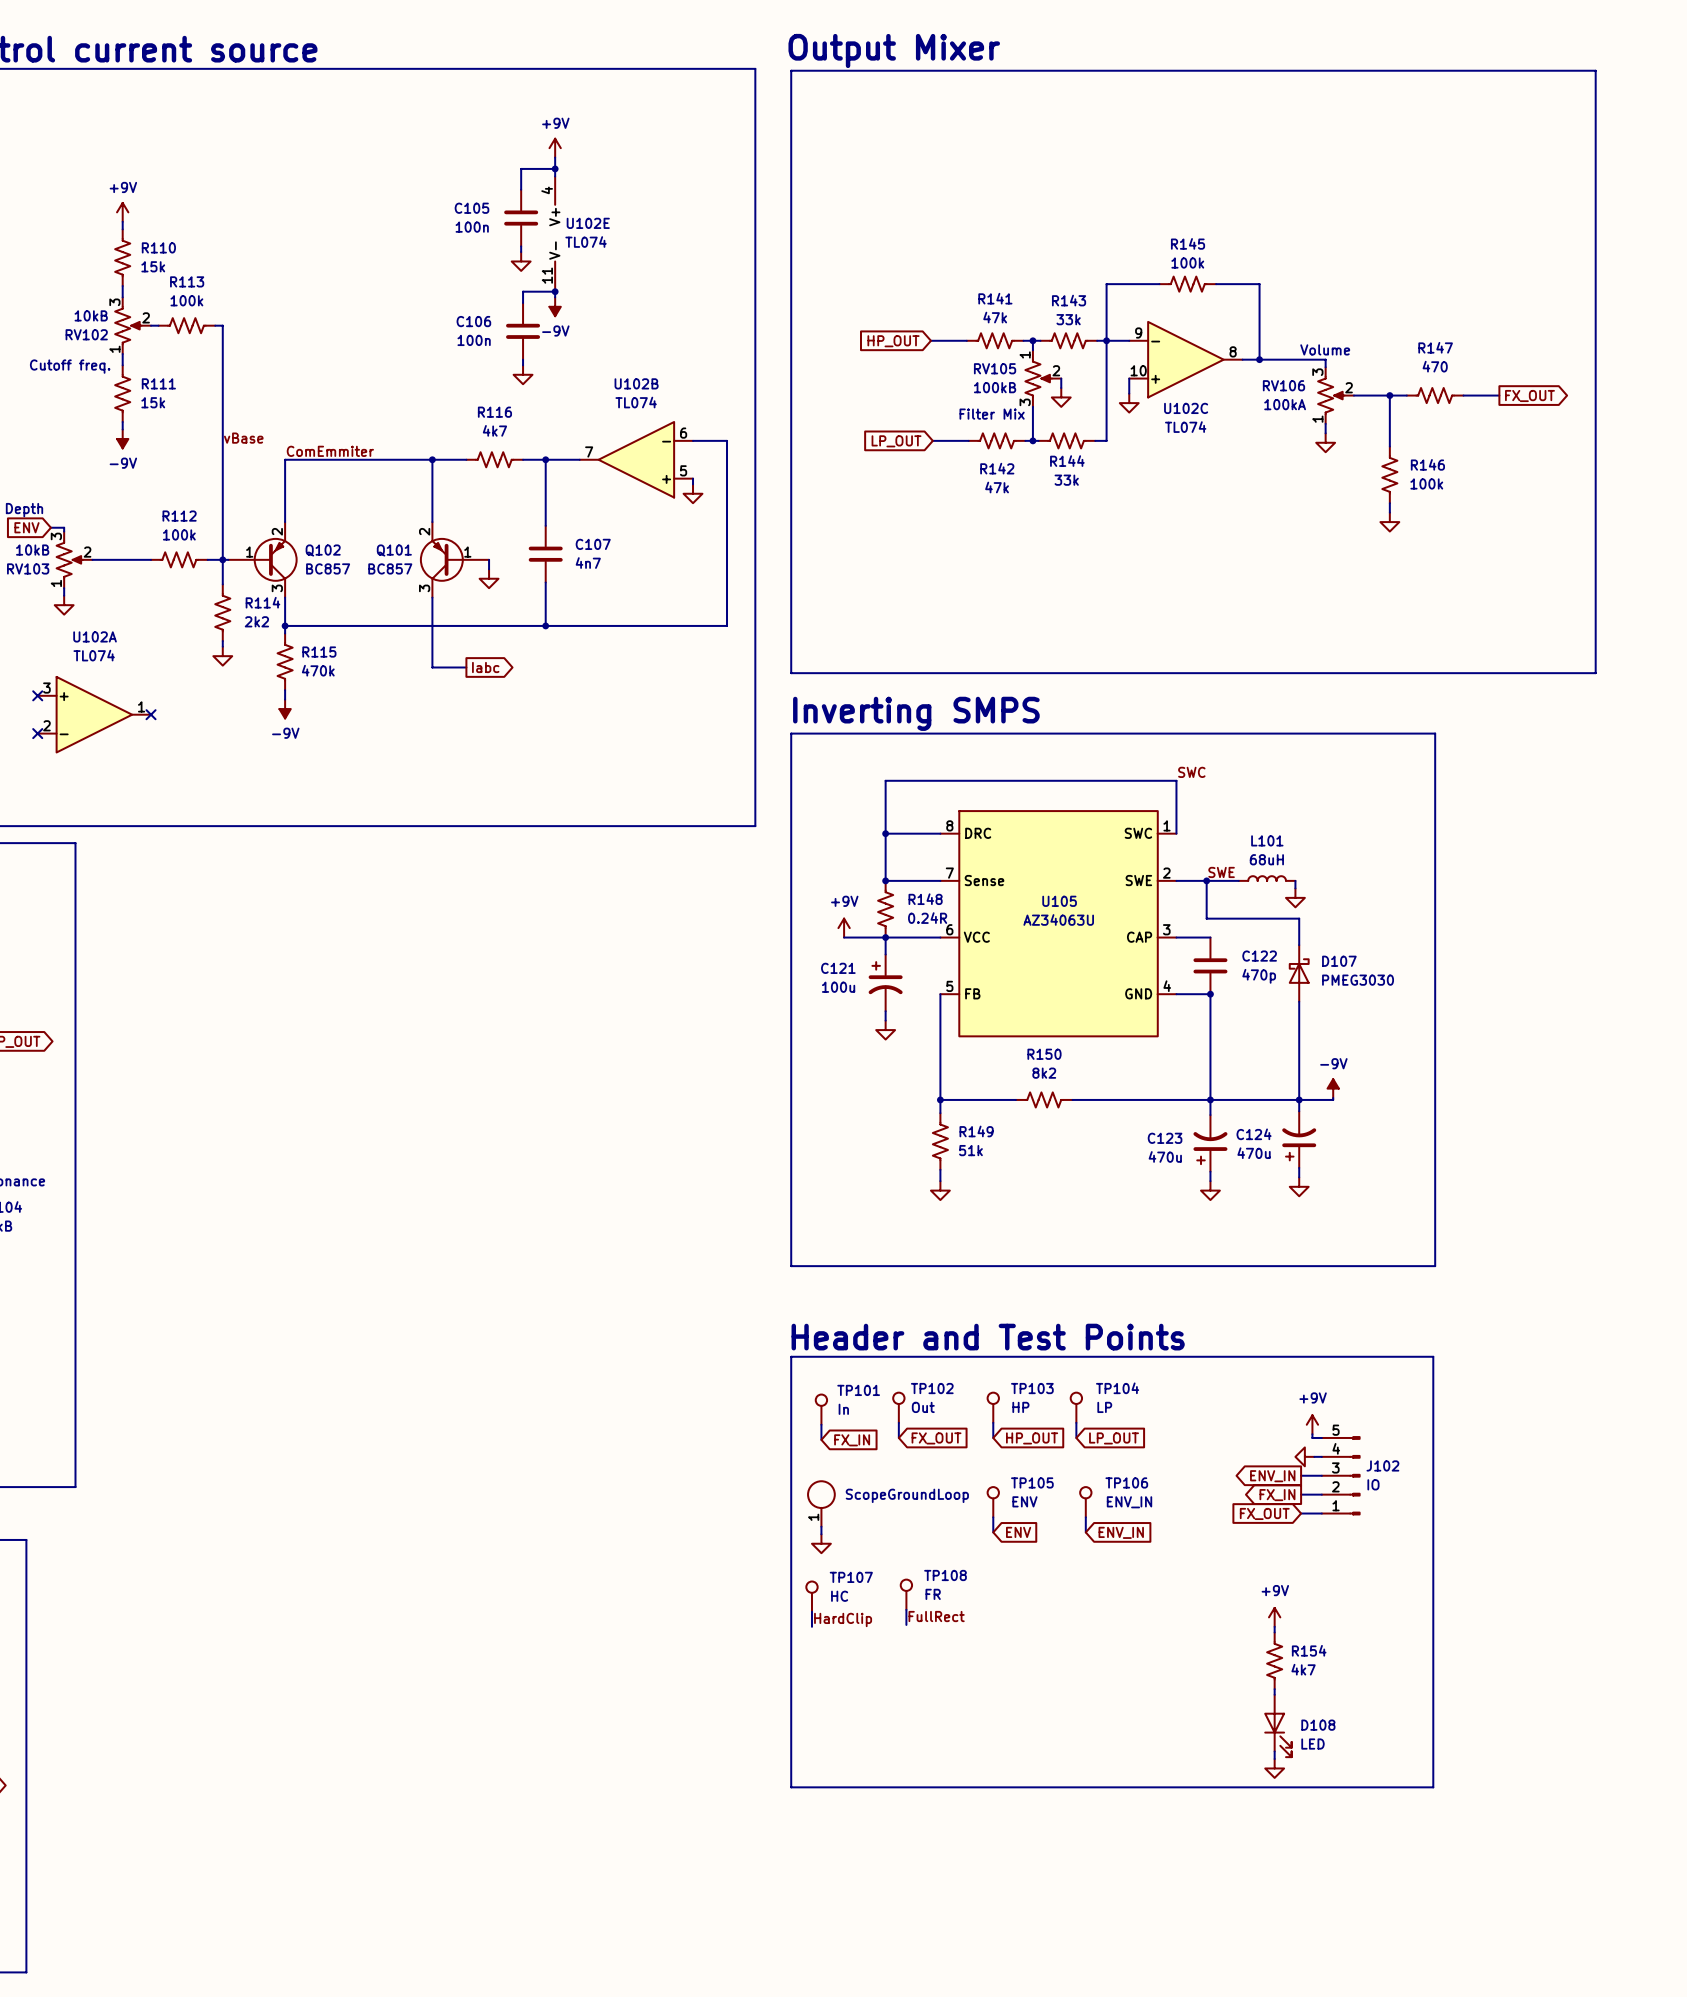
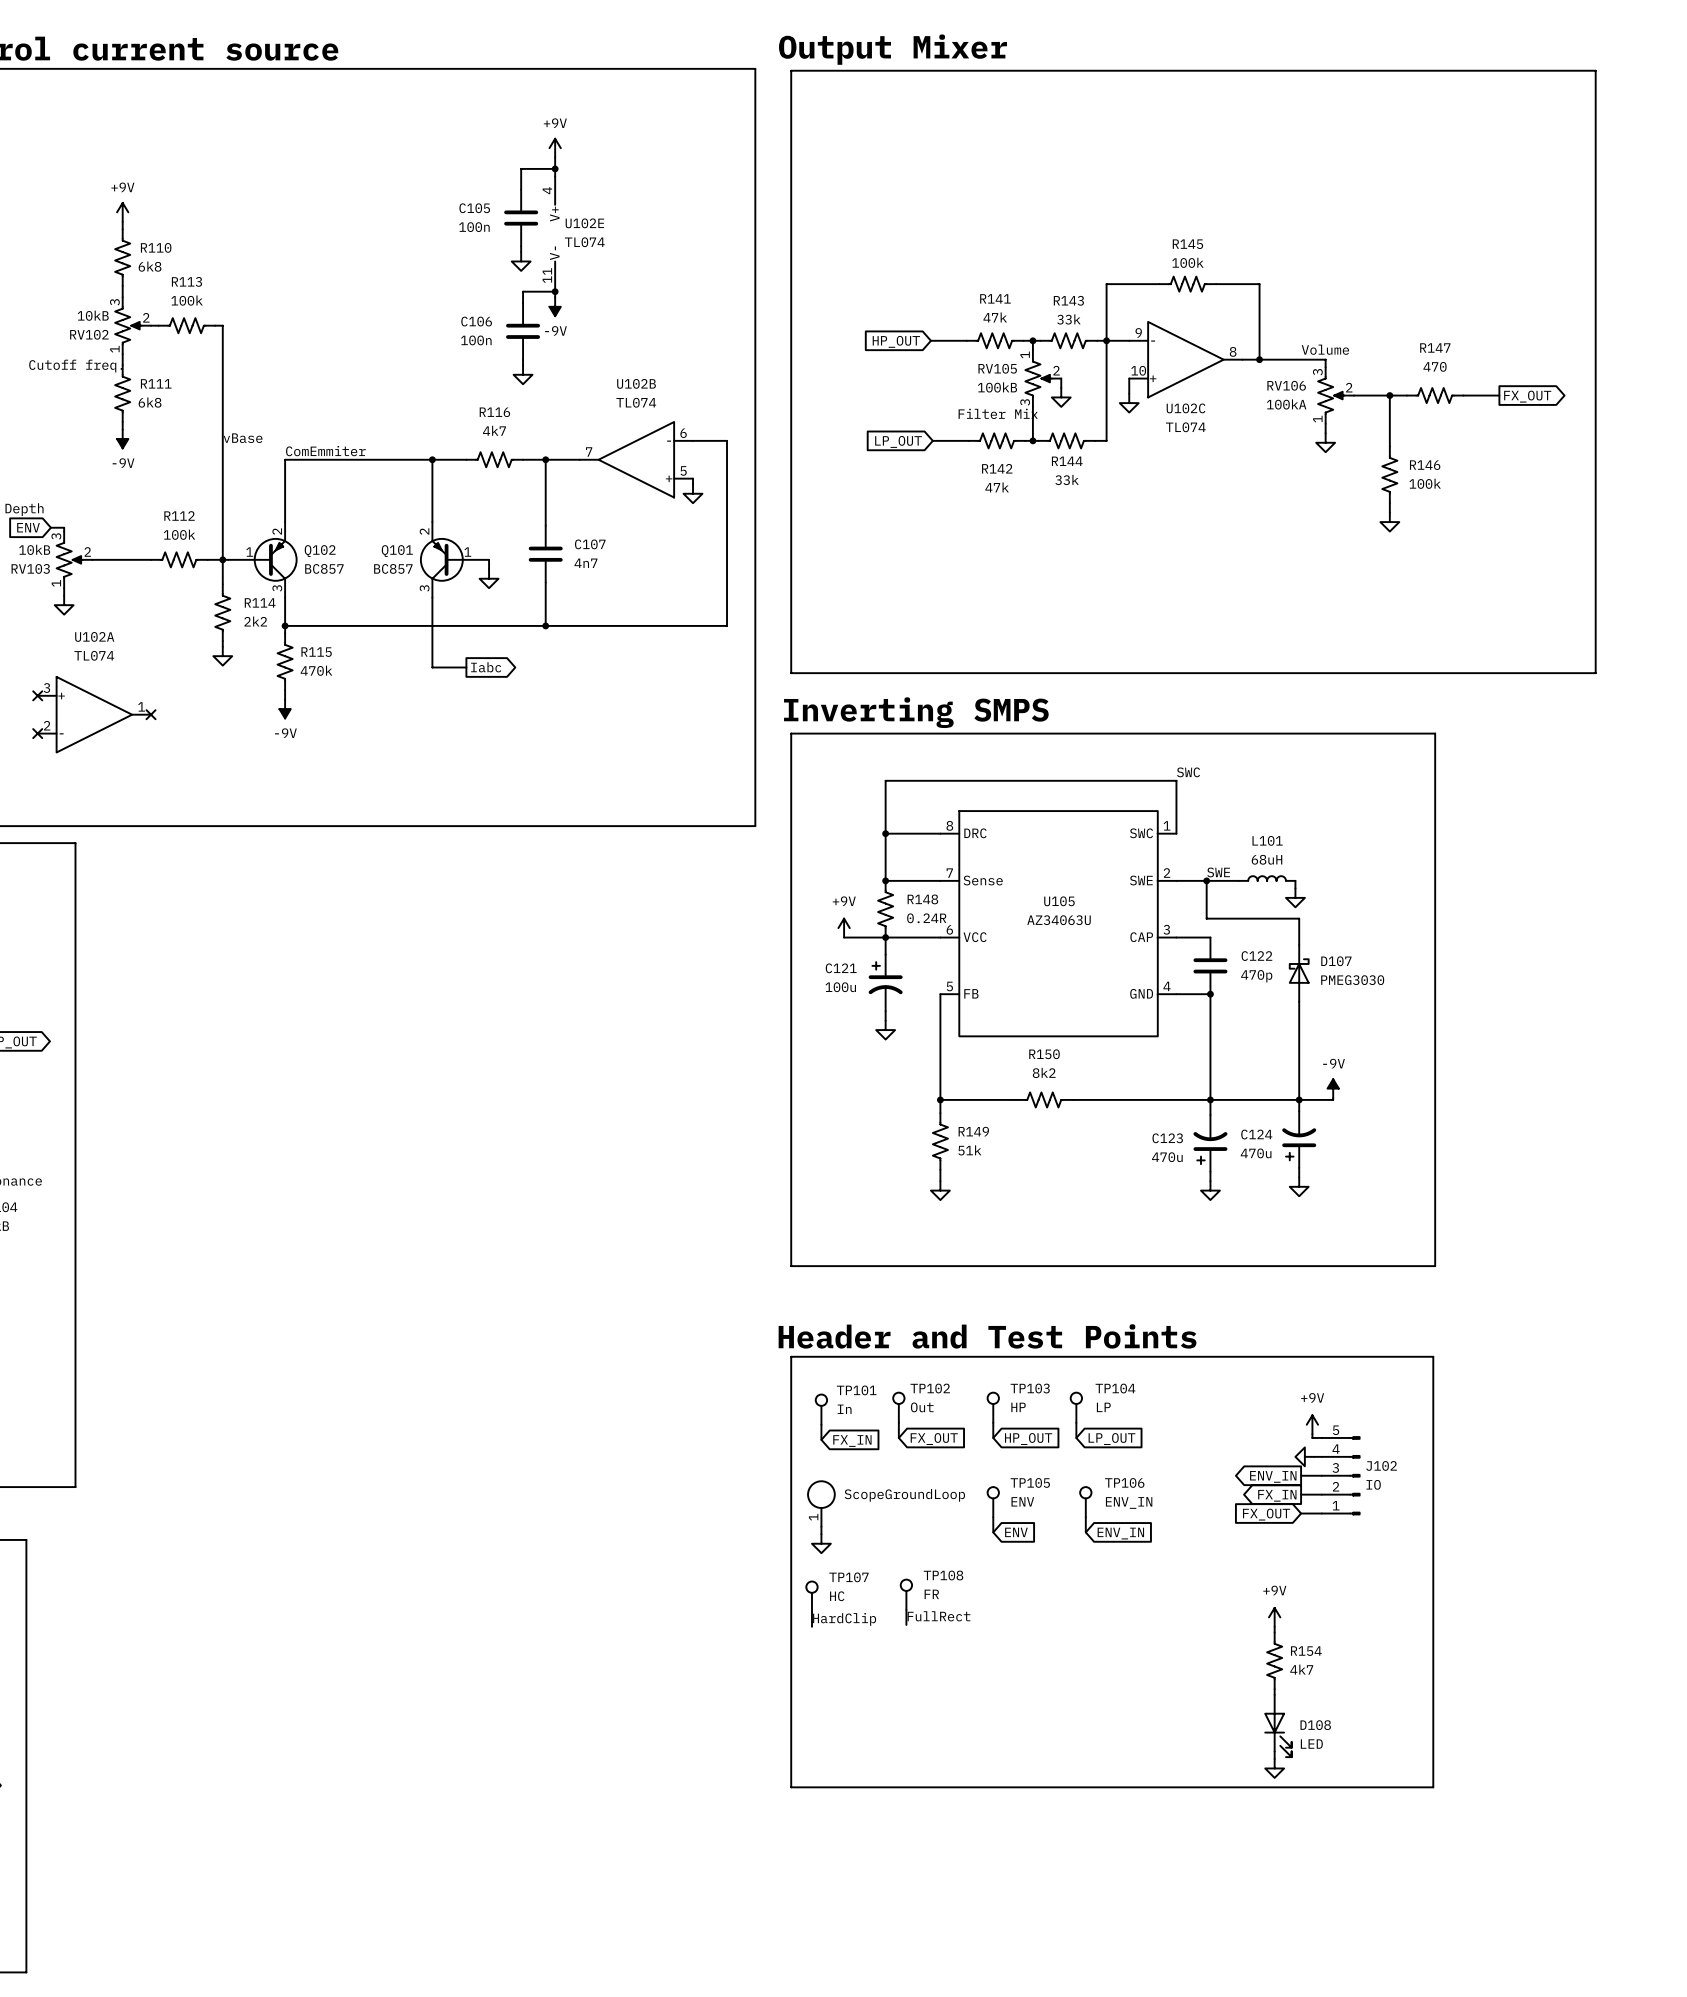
R110 value: 15k (153, 266) -> 6k8 (150, 266)
R111 value: 15k (153, 402) -> 6k8 (150, 402)

